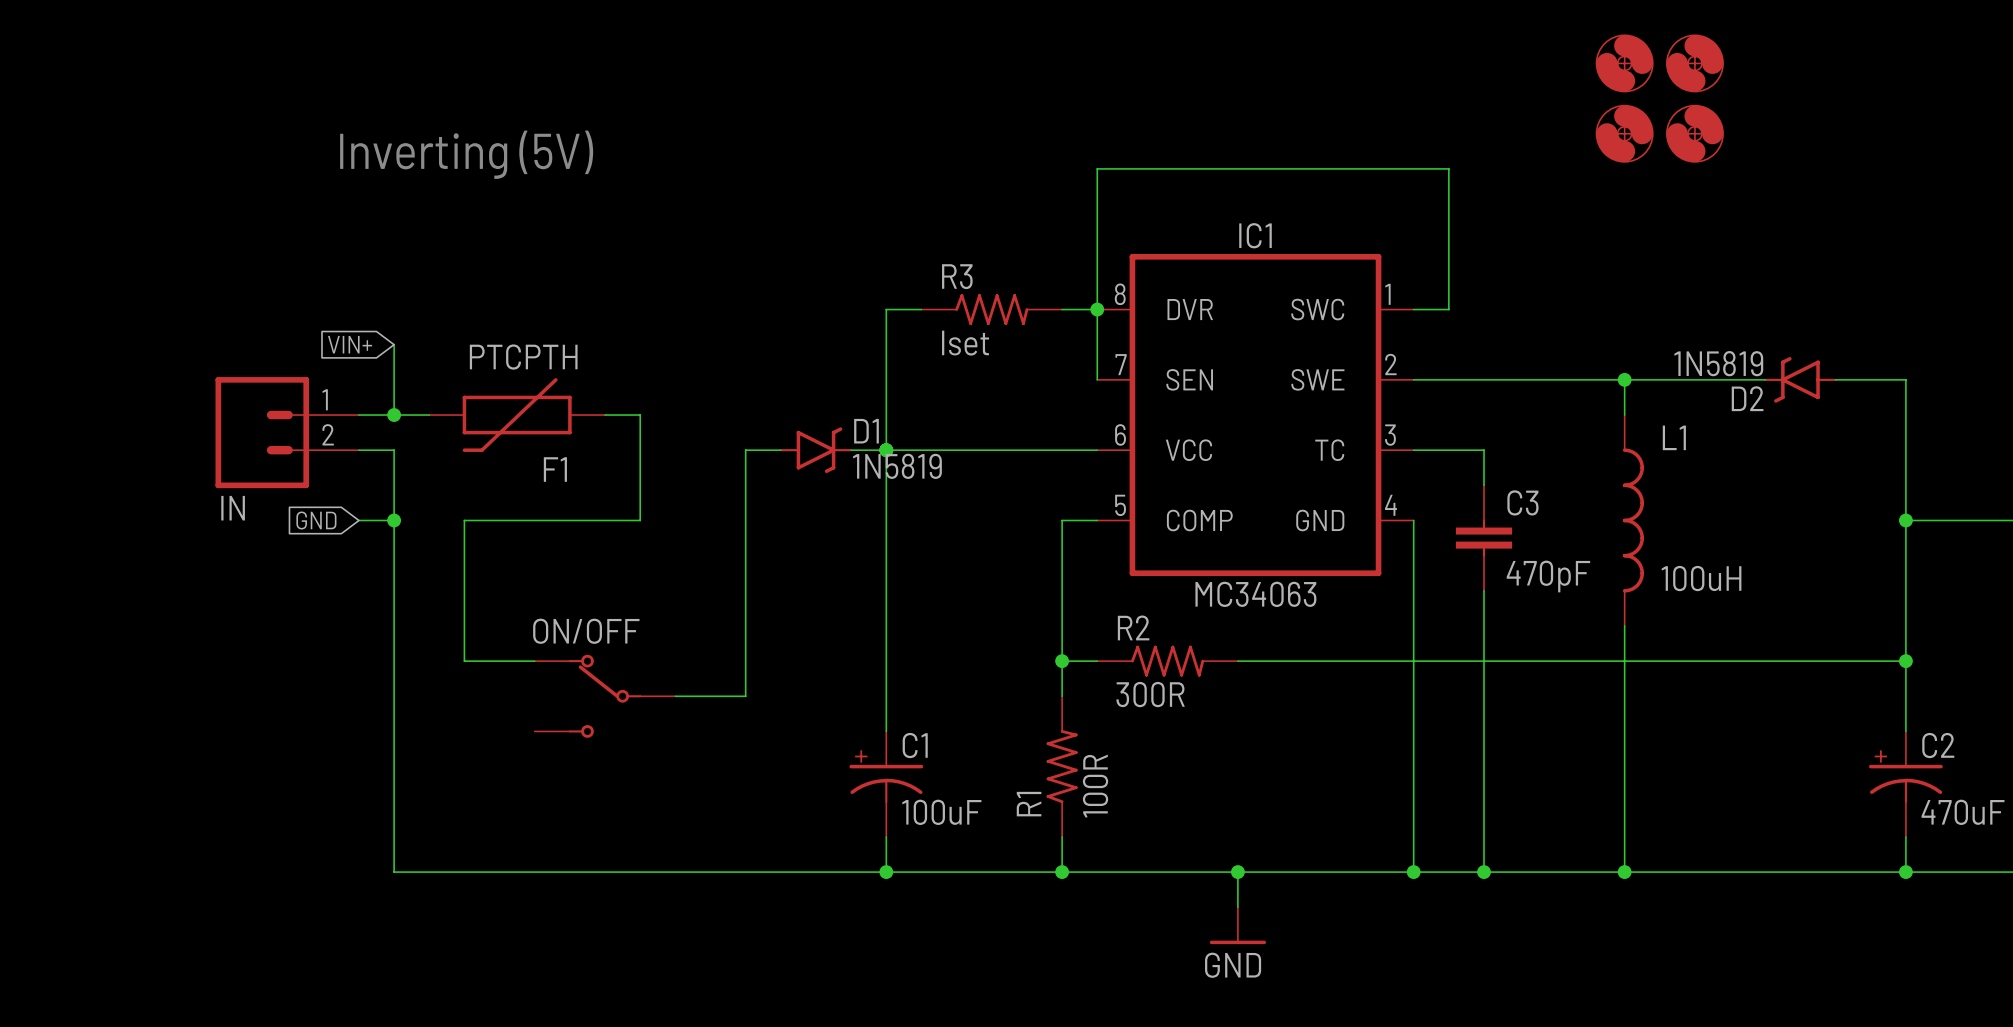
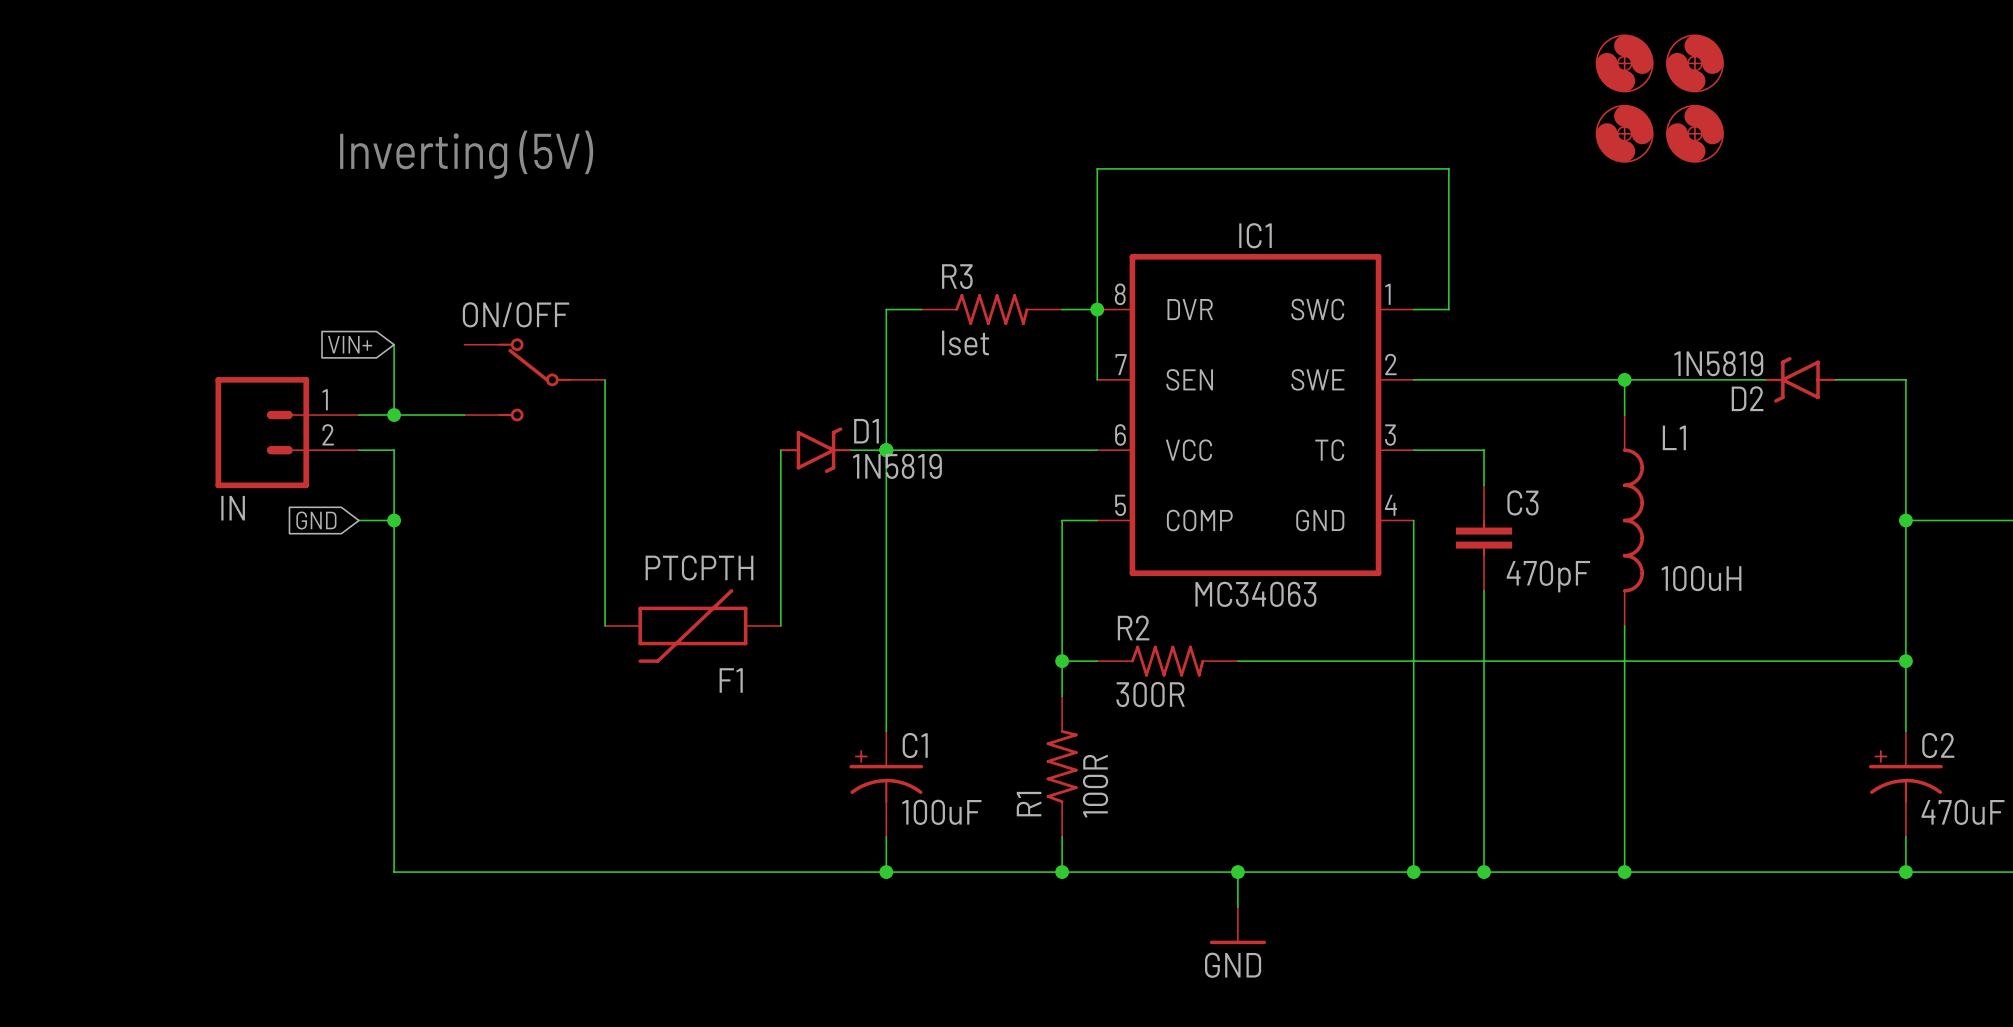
wire: none -> (605, 379) (605, 625)
F1 position: (517, 415) -> (692, 625)
wire: (605, 415) (640, 415) (640, 520) (464, 520) (464, 661) (534, 661) -> none
wire: (780, 450) (745, 450) (745, 696) (675, 696) -> (780, 450) (780, 625)
ON/OFF position: (605, 696) -> (534, 379)

